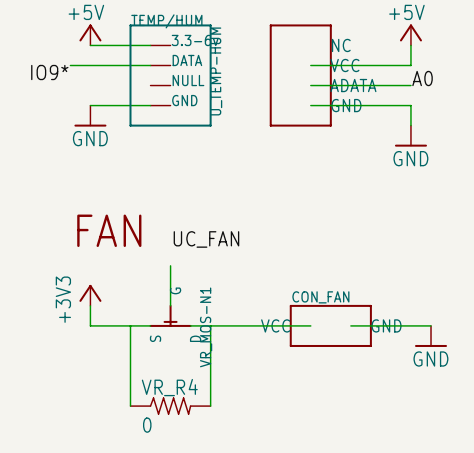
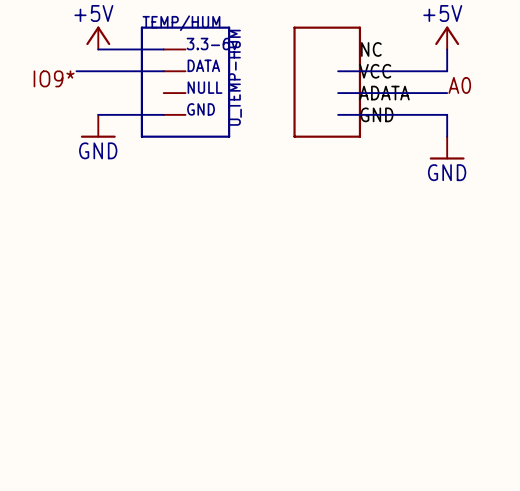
text: FAN (109, 230) -> none
label: UC_FAN (206, 239) -> none
wire: (170, 265) (170, 305) -> none
power symbol: +3V3 (90, 295) -> none
wire: (90, 305) (90, 325) (150, 325) -> none
VR_MOS-N1: (170, 315) -> none
wire: (130, 325) (130, 406) -> none
wire: (190, 325) (310, 325) -> none
wire: (210, 325) (210, 406) -> none
CON_FAN: (330, 325) -> none
wire: (350, 325) (431, 325) -> none
power symbol: GND (431, 336) -> none
VR_R4: 0 (170, 406) -> none

